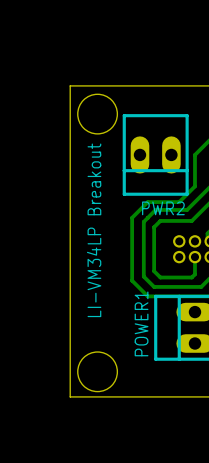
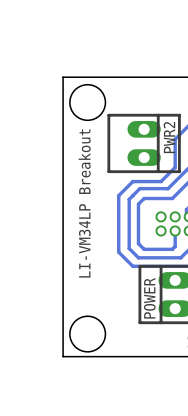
PWR2 rotation: 0° (155, 154) -> 90° counterclockwise (144, 143)
PWR2 name position: PWR2 (163, 208) -> PWR2 (169, 137)
POWER1 name: POWER1 (141, 323) -> POWER (149, 298)

